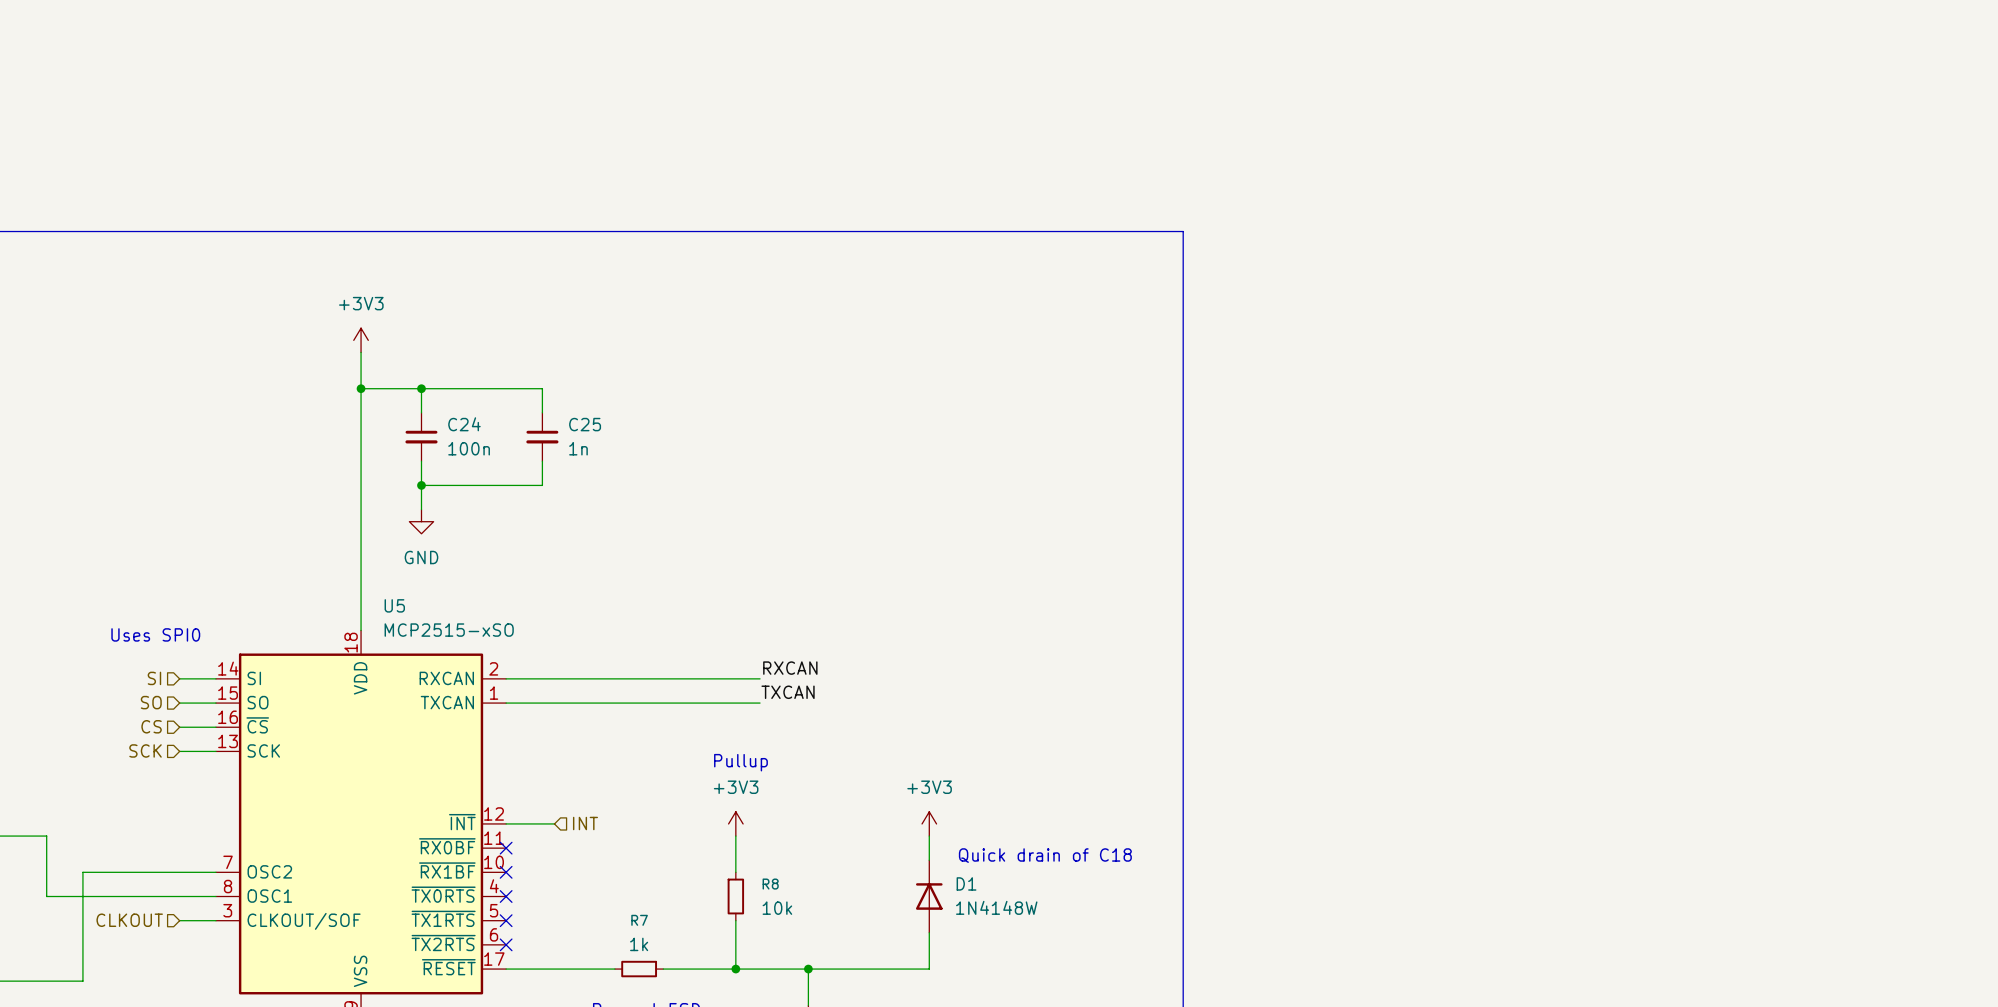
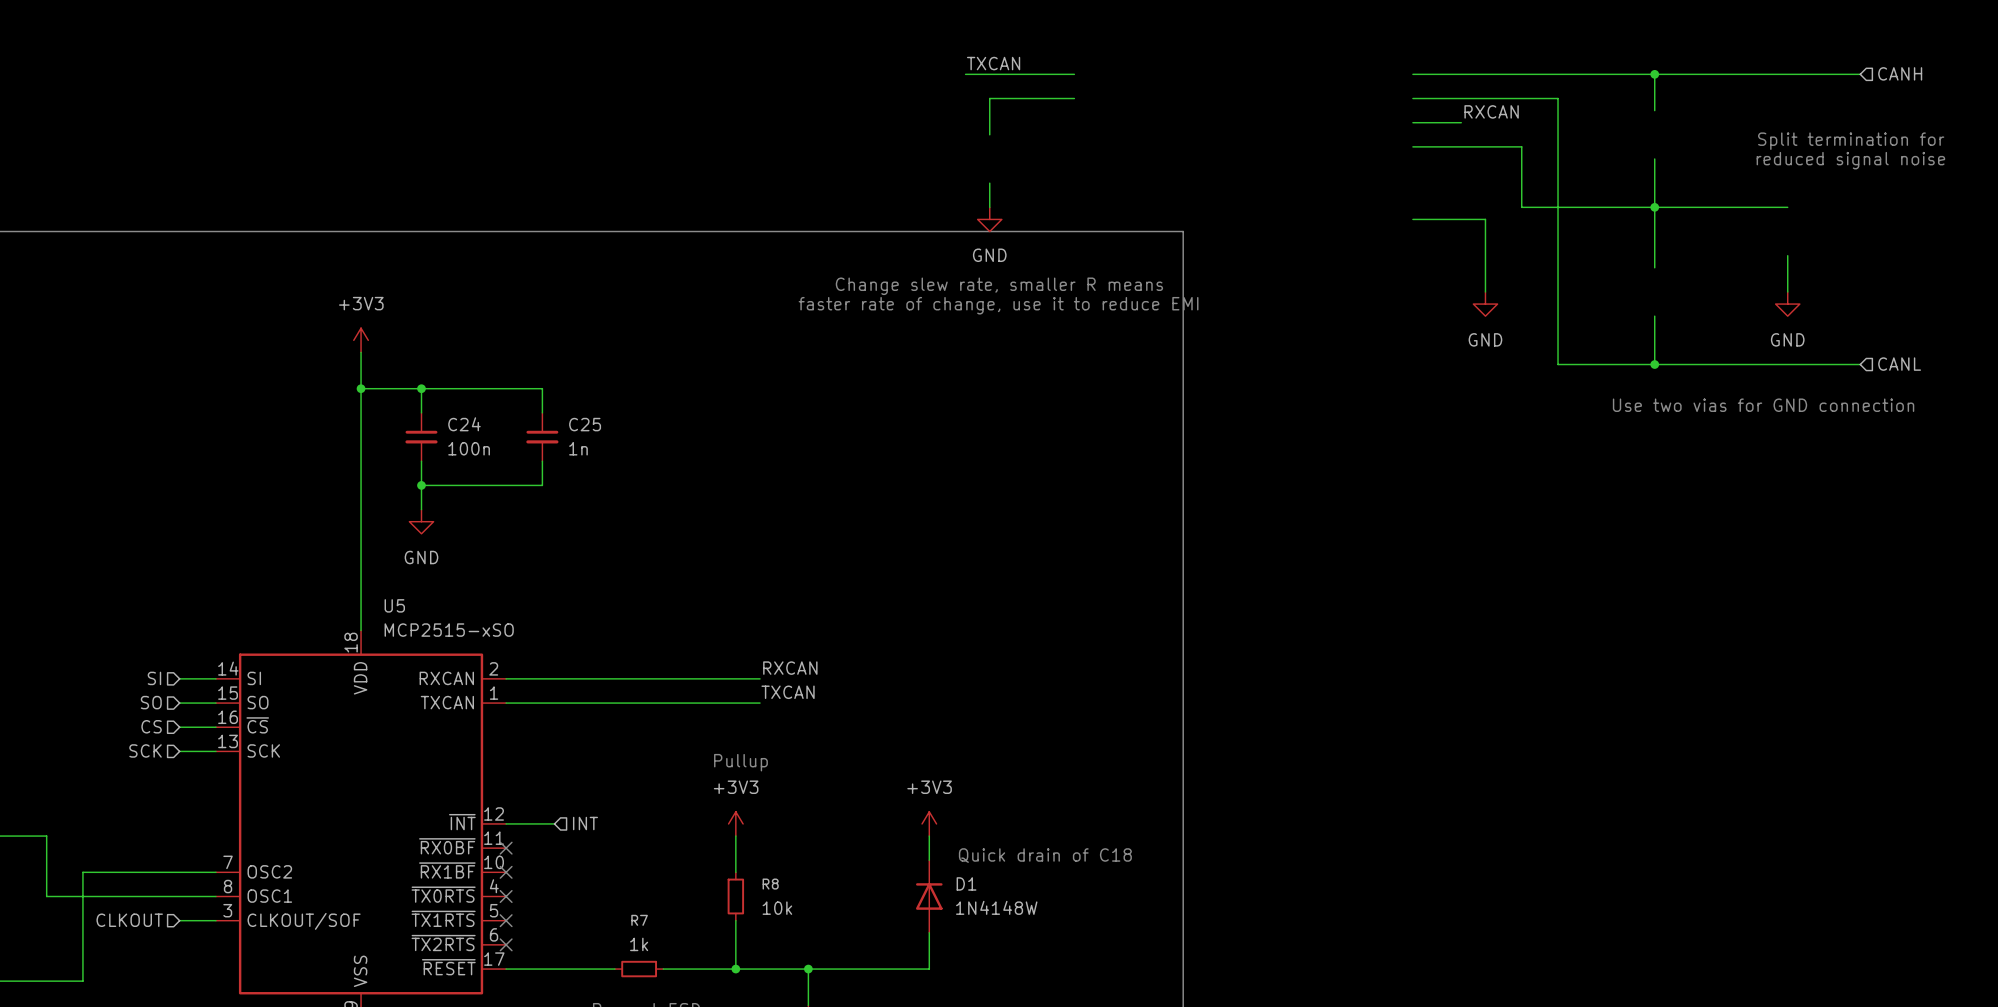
label: none -> TXCAN (993, 63)
hierarchical label: none -> CANH (1900, 73)
wire: none -> (965, 74) (1074, 74)
wire: none -> (1412, 74) (1860, 74)
wire: none -> (1654, 74) (1654, 110)
junction: none -> (1654, 74)
wire: none -> (1074, 98) (989, 98) (989, 134)
wire: none -> (1412, 98) (1558, 98) (1558, 364) (1860, 364)
label: none -> RXCAN (1491, 111)
wire: none -> (1412, 122) (1461, 122)
text: none -> Split termination for (1851, 141)
wire: none -> (1412, 146) (1521, 146) (1521, 207) (1787, 207)
wire: none -> (1654, 158) (1654, 267)
text: none -> reduced signal noise (1850, 160)
wire: none -> (989, 183) (989, 207)
junction: none -> (1654, 207)
power symbol: none -> GND (989, 219)
wire: none -> (1412, 219) (1485, 219) (1485, 291)
wire: none -> (1787, 255) (1787, 291)
text: none -> Change slew rate, smaller R means (999, 286)
power symbol: none -> GND (1485, 304)
power symbol: none -> GND (1787, 304)
text: none -> faster rate of change, use it to reduce EMI (998, 305)
wire: none -> (1654, 316) (1654, 364)
junction: none -> (1654, 364)
hierarchical label: none -> CANL (1899, 364)
text: none -> Use two vias for GND connection (1763, 405)
text: Uses SPI0 (155, 634) -> none

